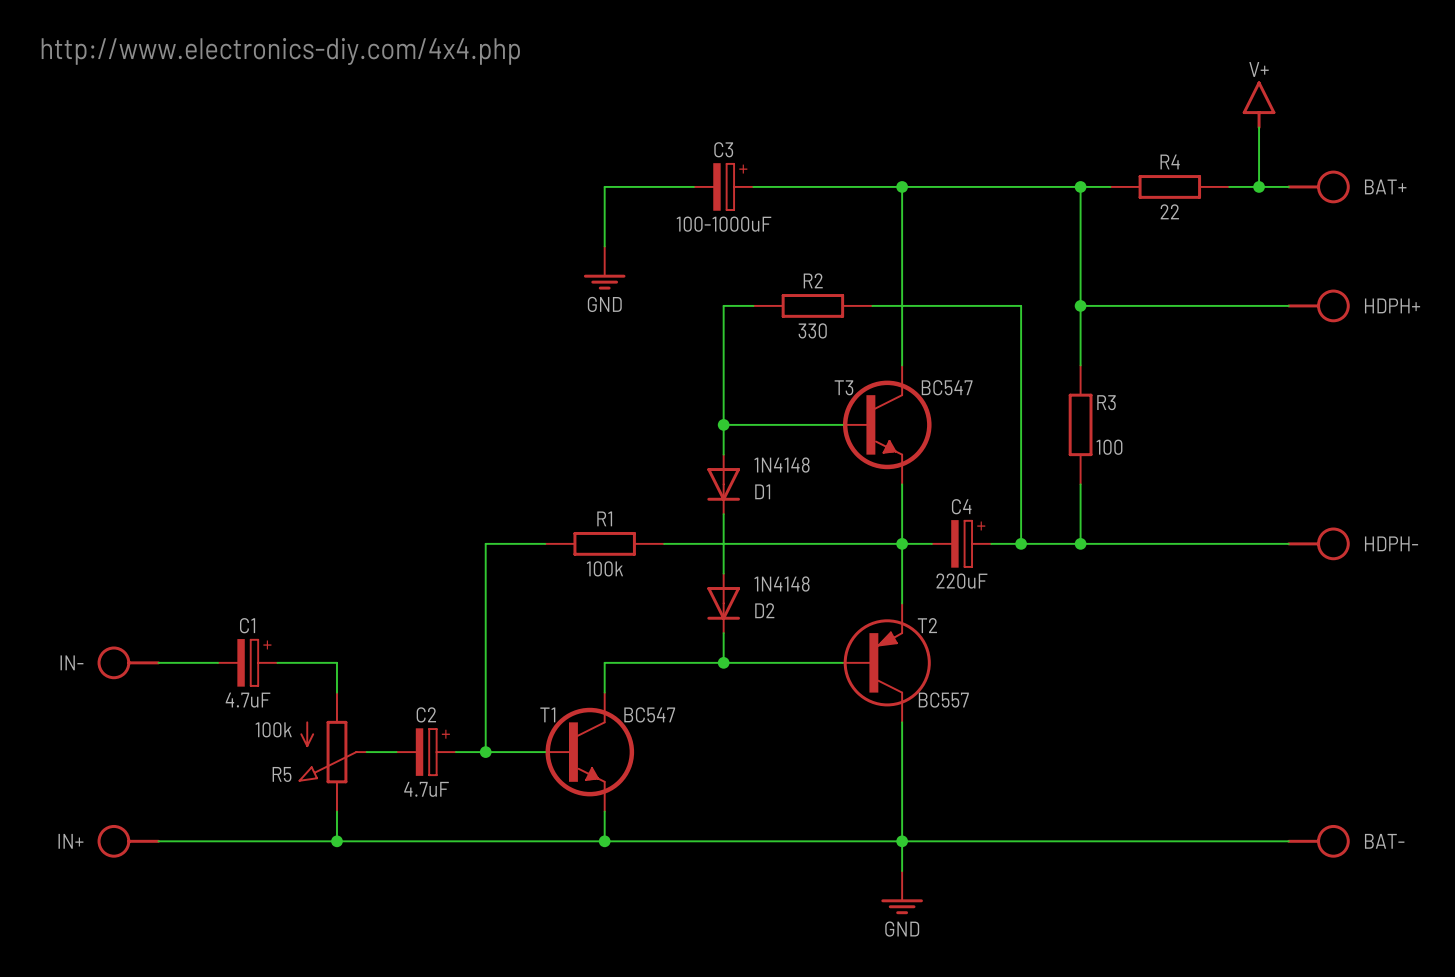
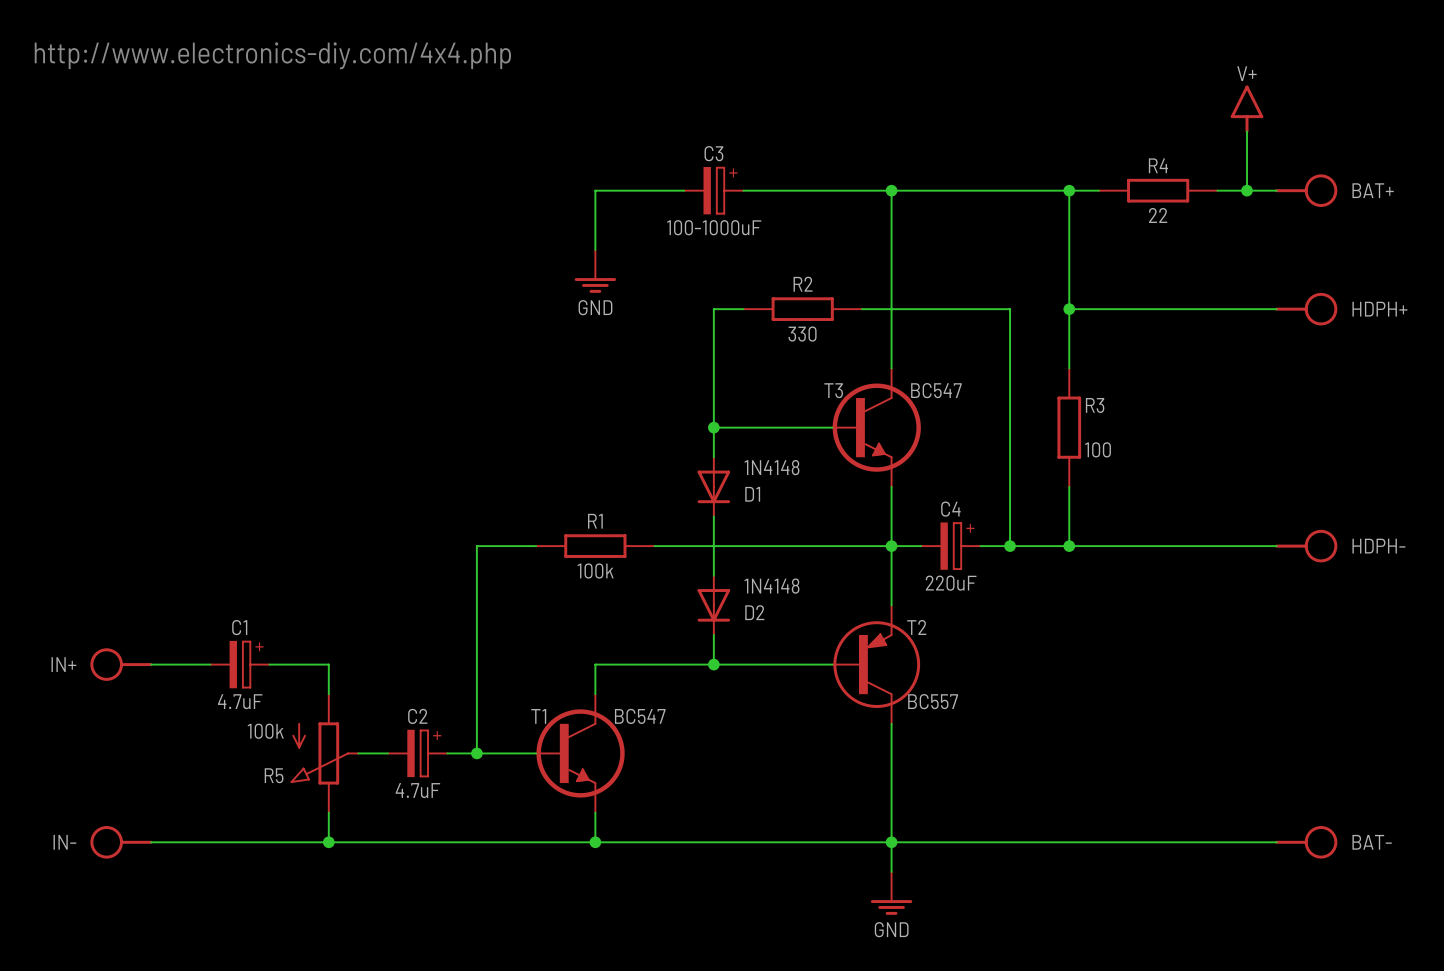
IN- name: IN- (71, 662) -> IN+ (63, 664)
IN+ name: IN+ (70, 841) -> IN- (64, 842)

